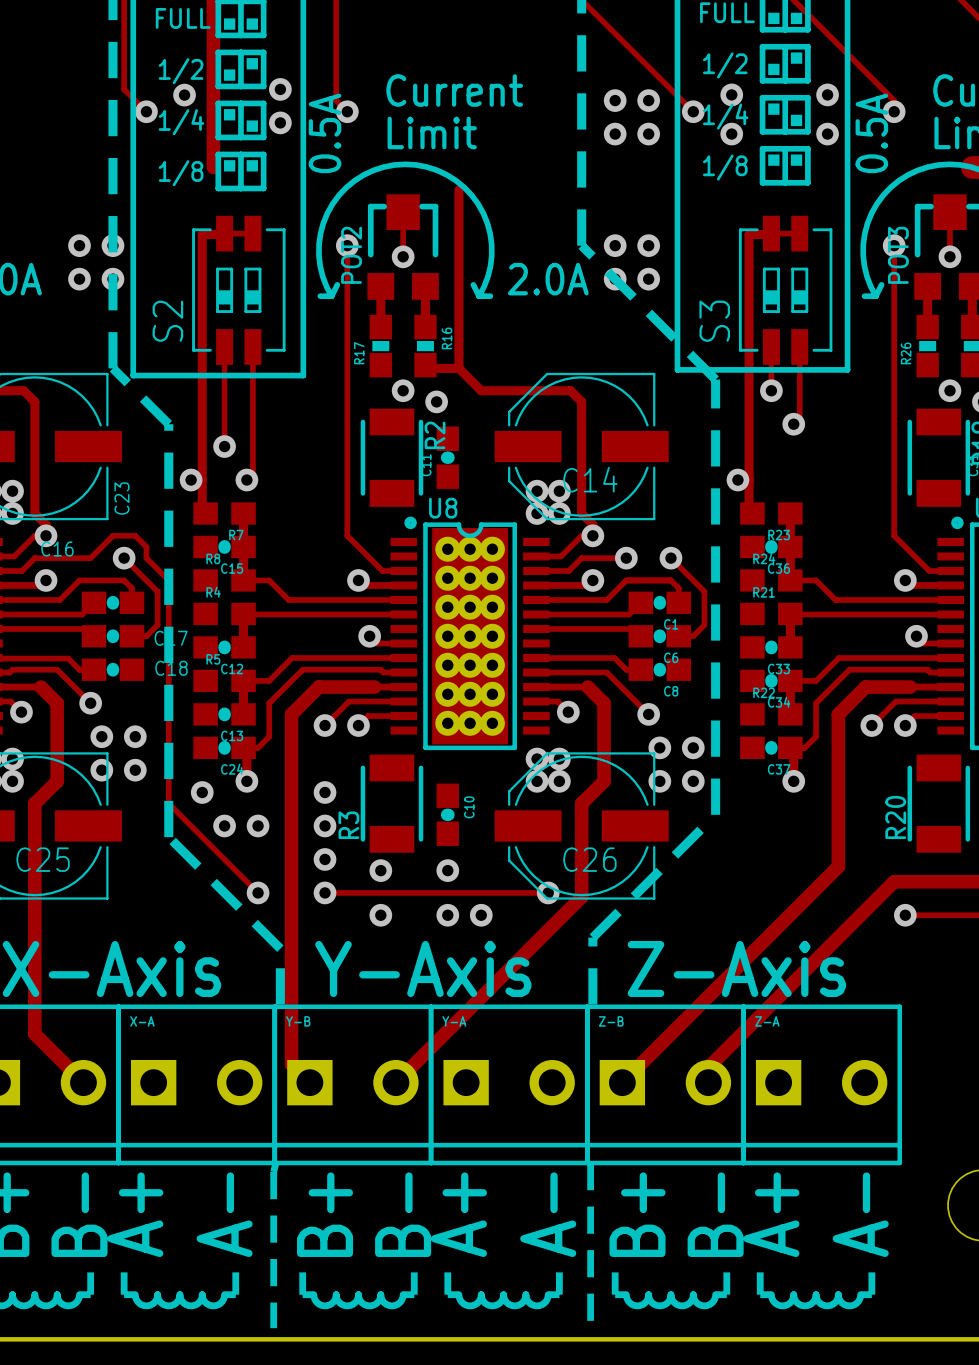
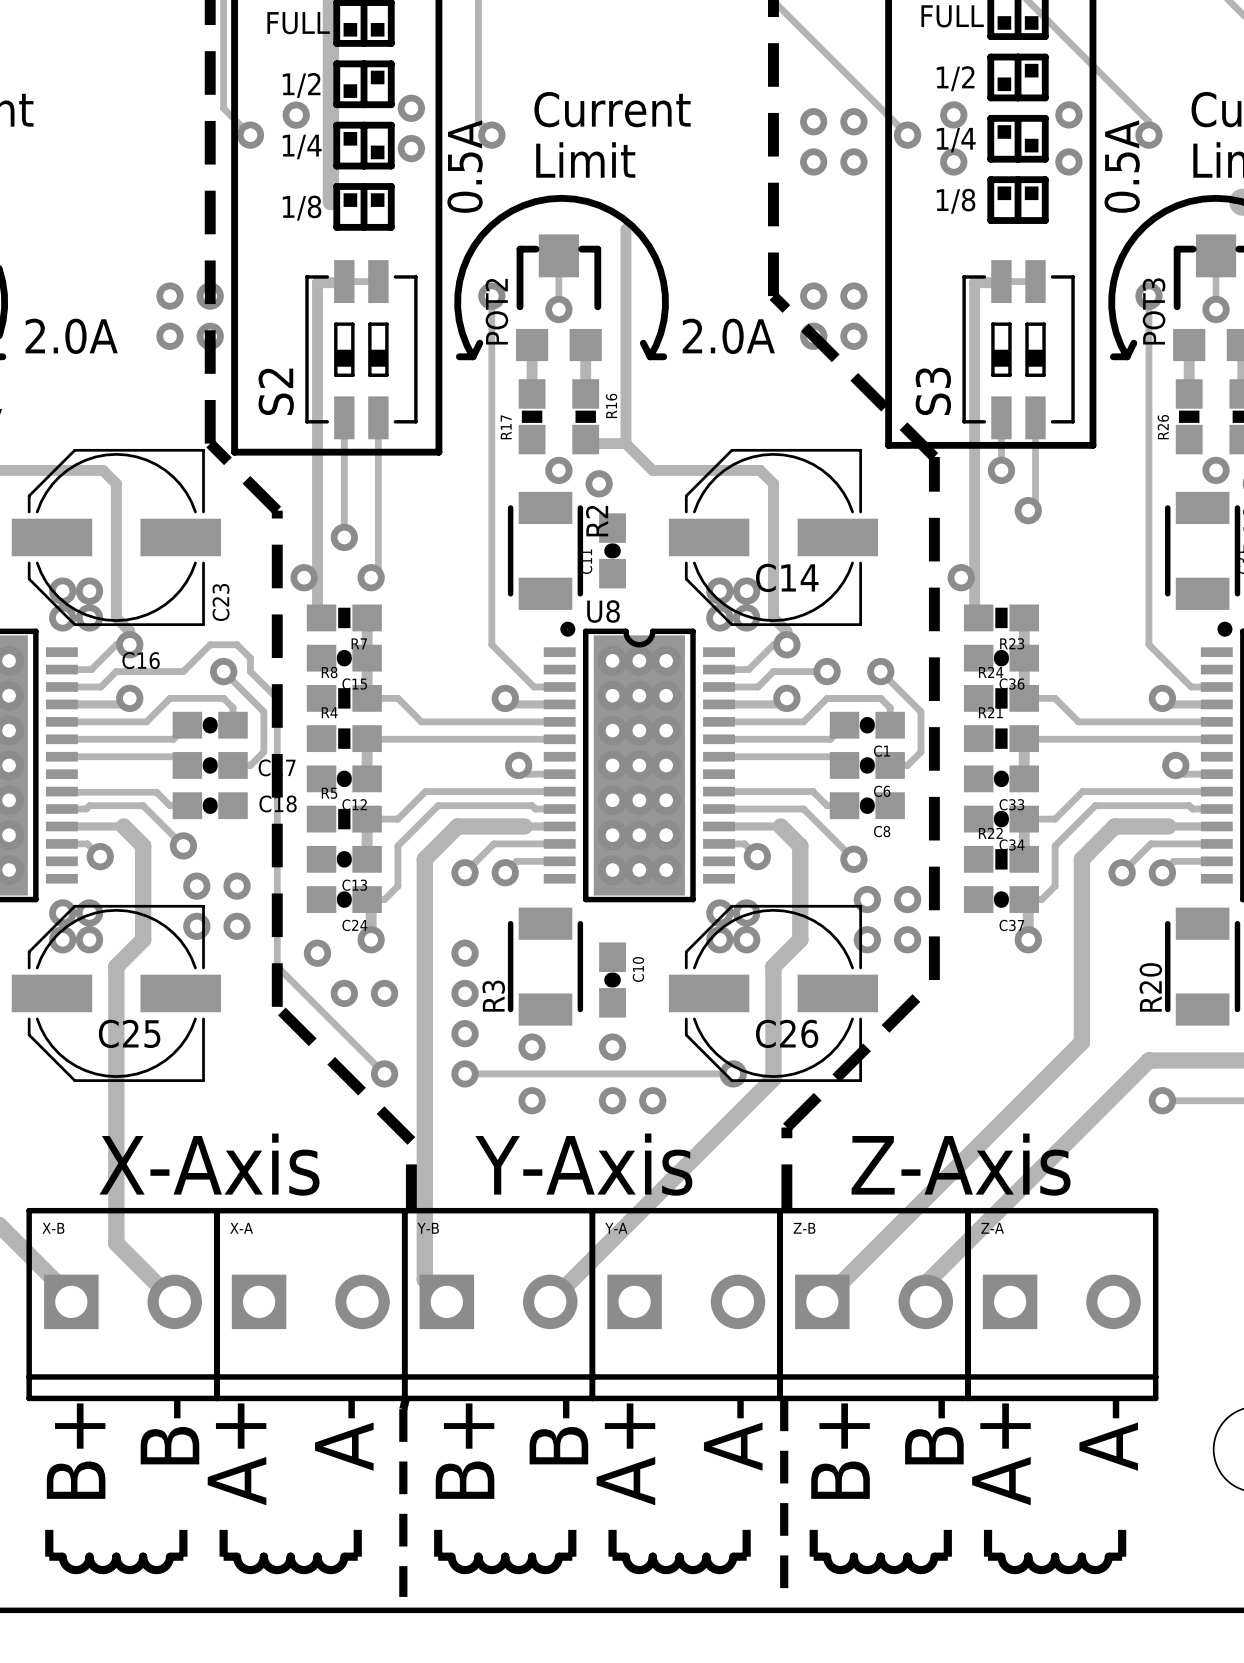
R7 footprint: [193, 502, 256, 525] -> [306, 604, 382, 632]
R23 footprint: [740, 502, 803, 525] -> [963, 604, 1040, 632]
R8 footprint: [193, 569, 256, 592] -> [306, 684, 382, 712]
R24 footprint: [740, 569, 803, 592] -> [963, 684, 1040, 712]
R4 footprint: [193, 602, 256, 626] -> [306, 725, 382, 753]
R21 footprint: [740, 602, 803, 626] -> [963, 725, 1040, 753]
R5 footprint: [193, 669, 256, 693] -> [306, 805, 382, 833]
R22 footprint: [740, 703, 803, 726] -> [963, 845, 1040, 873]

